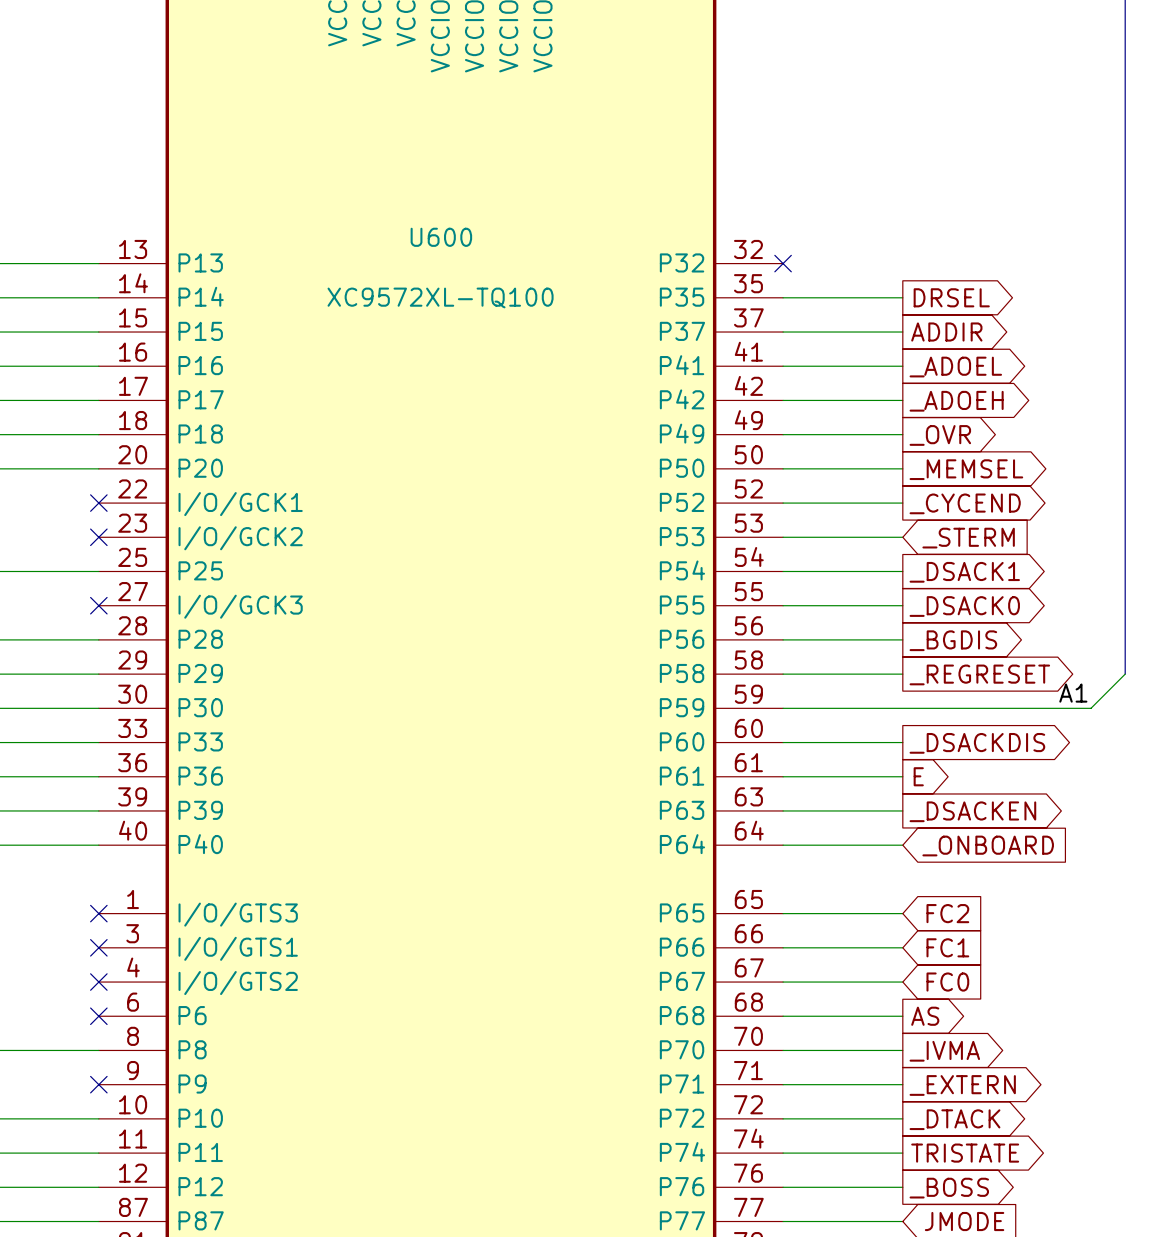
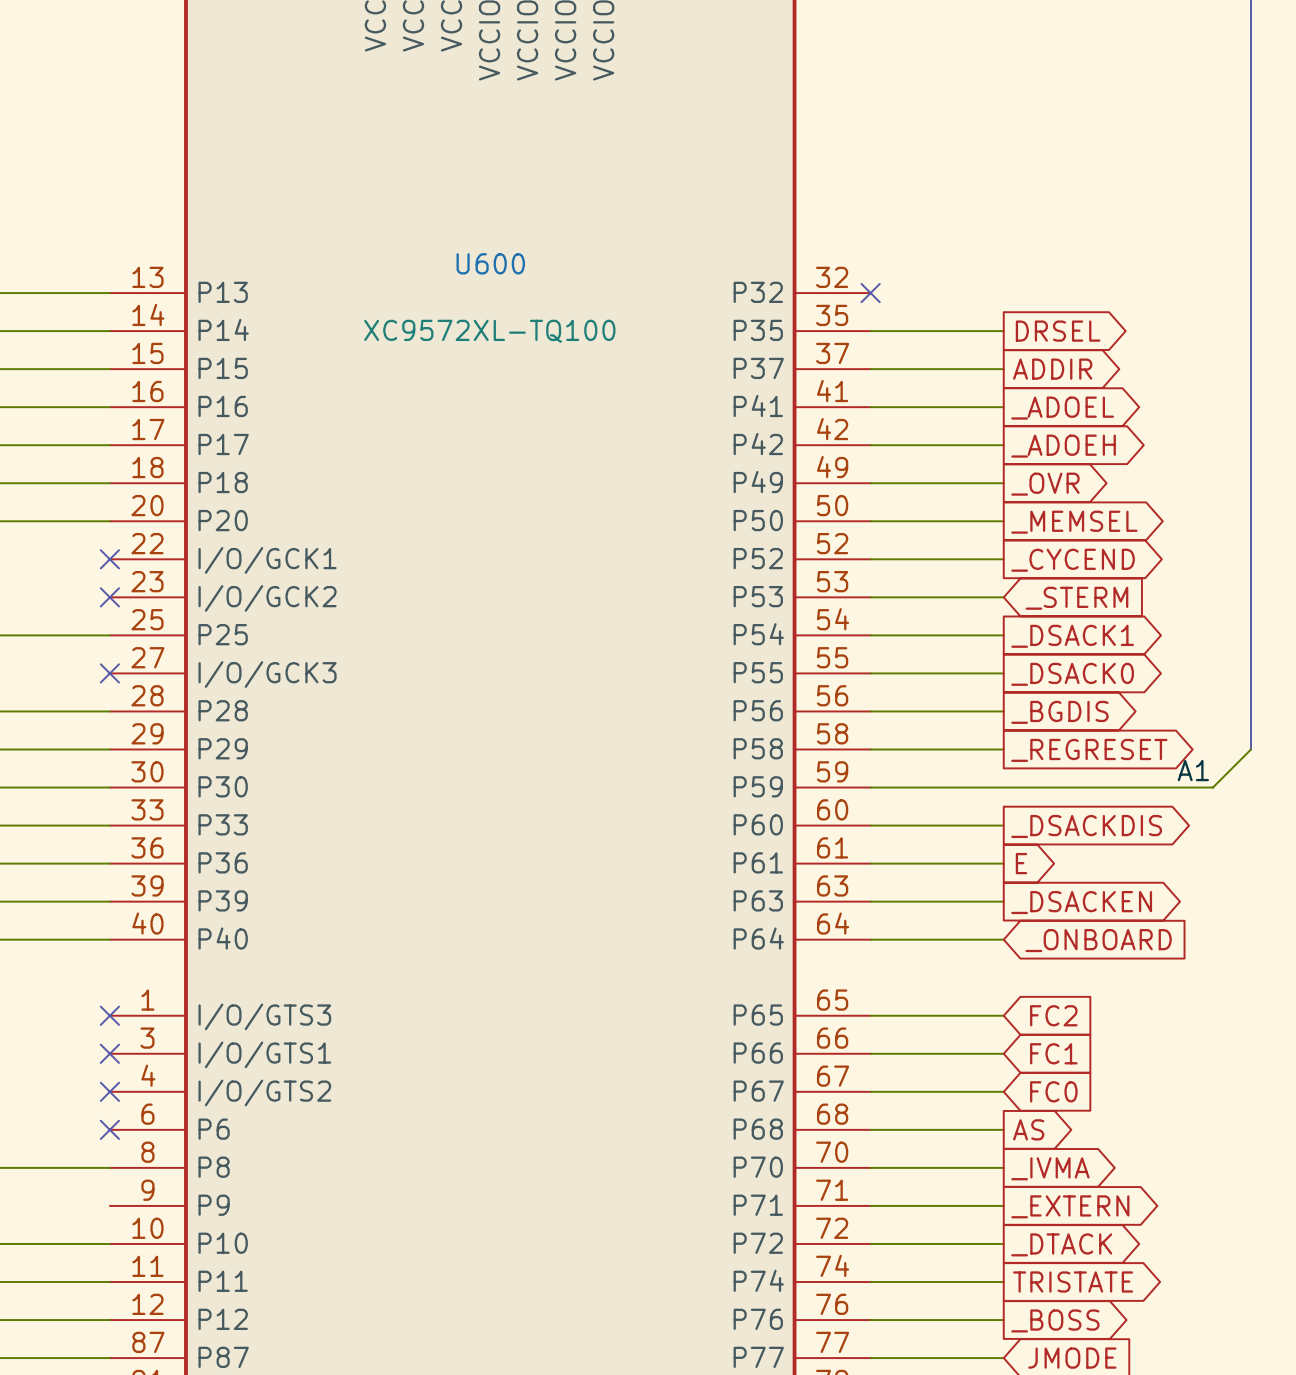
no-connect mark: (98, 1084) -> none

